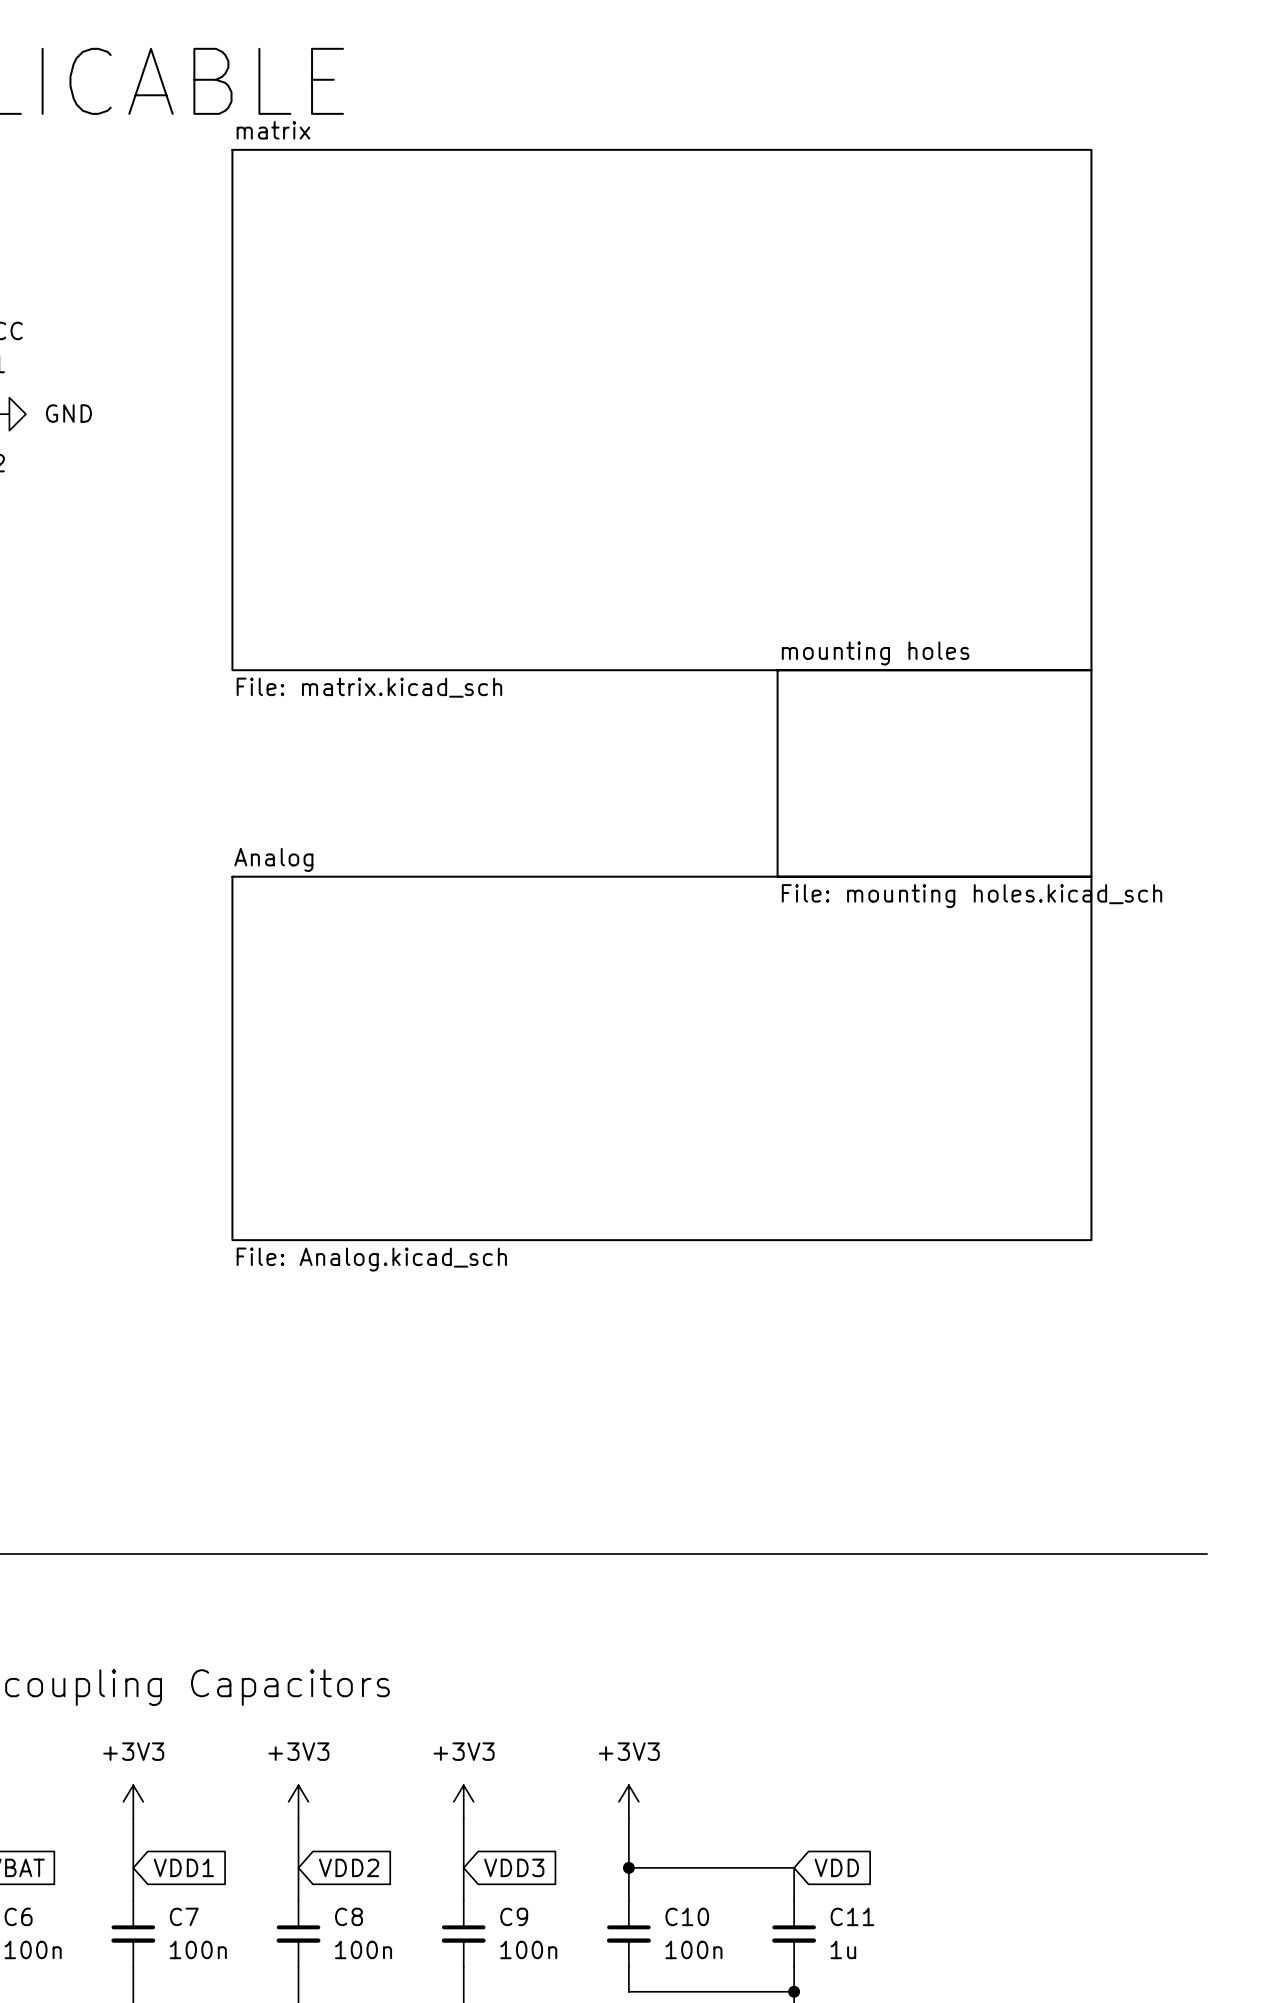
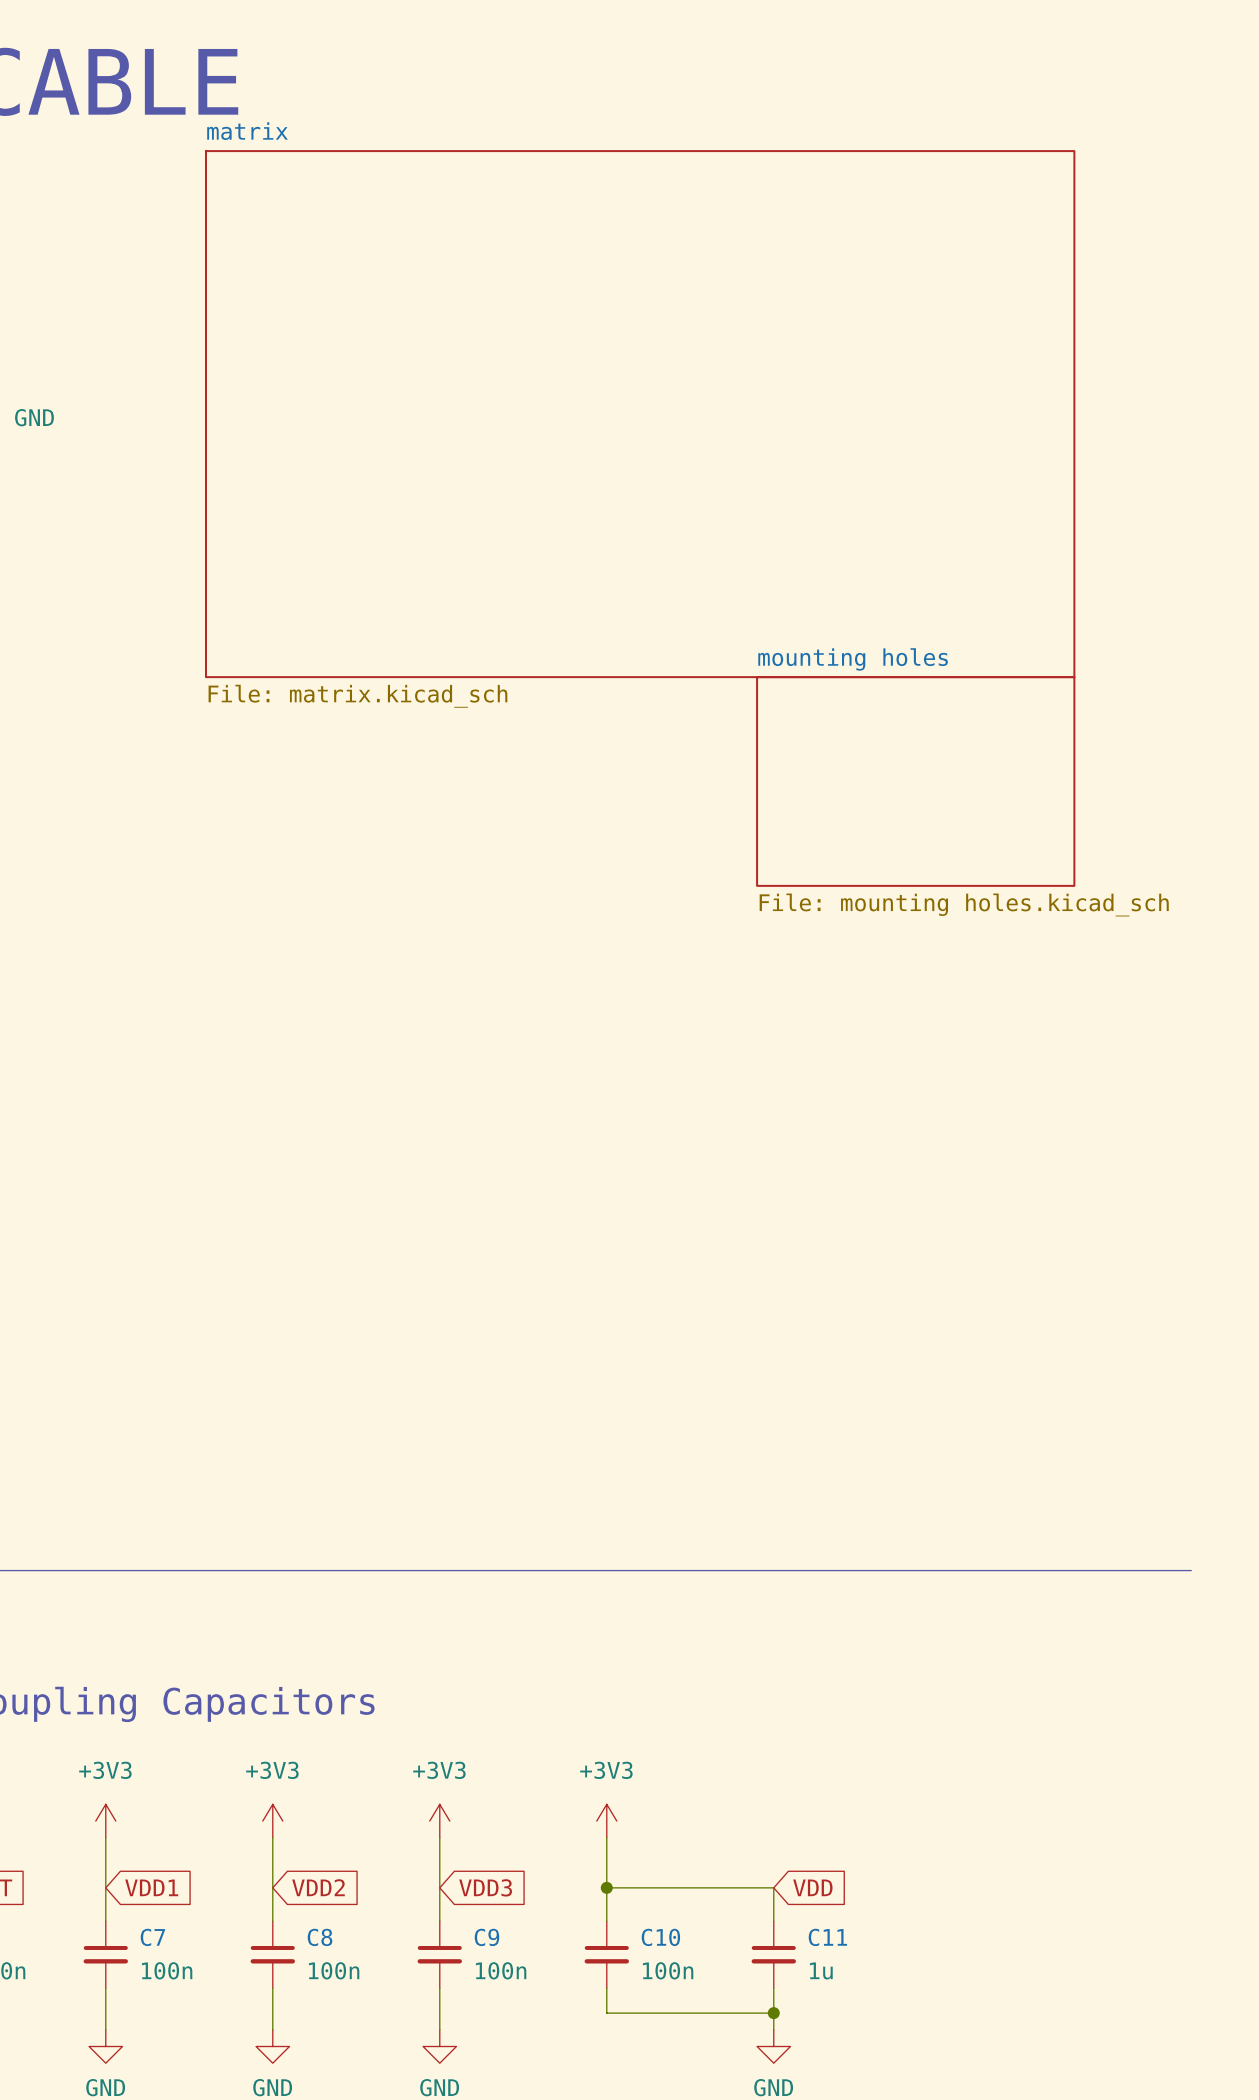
sheet Analog: File: Analog.kicad_sch (661, 1058) -> none

